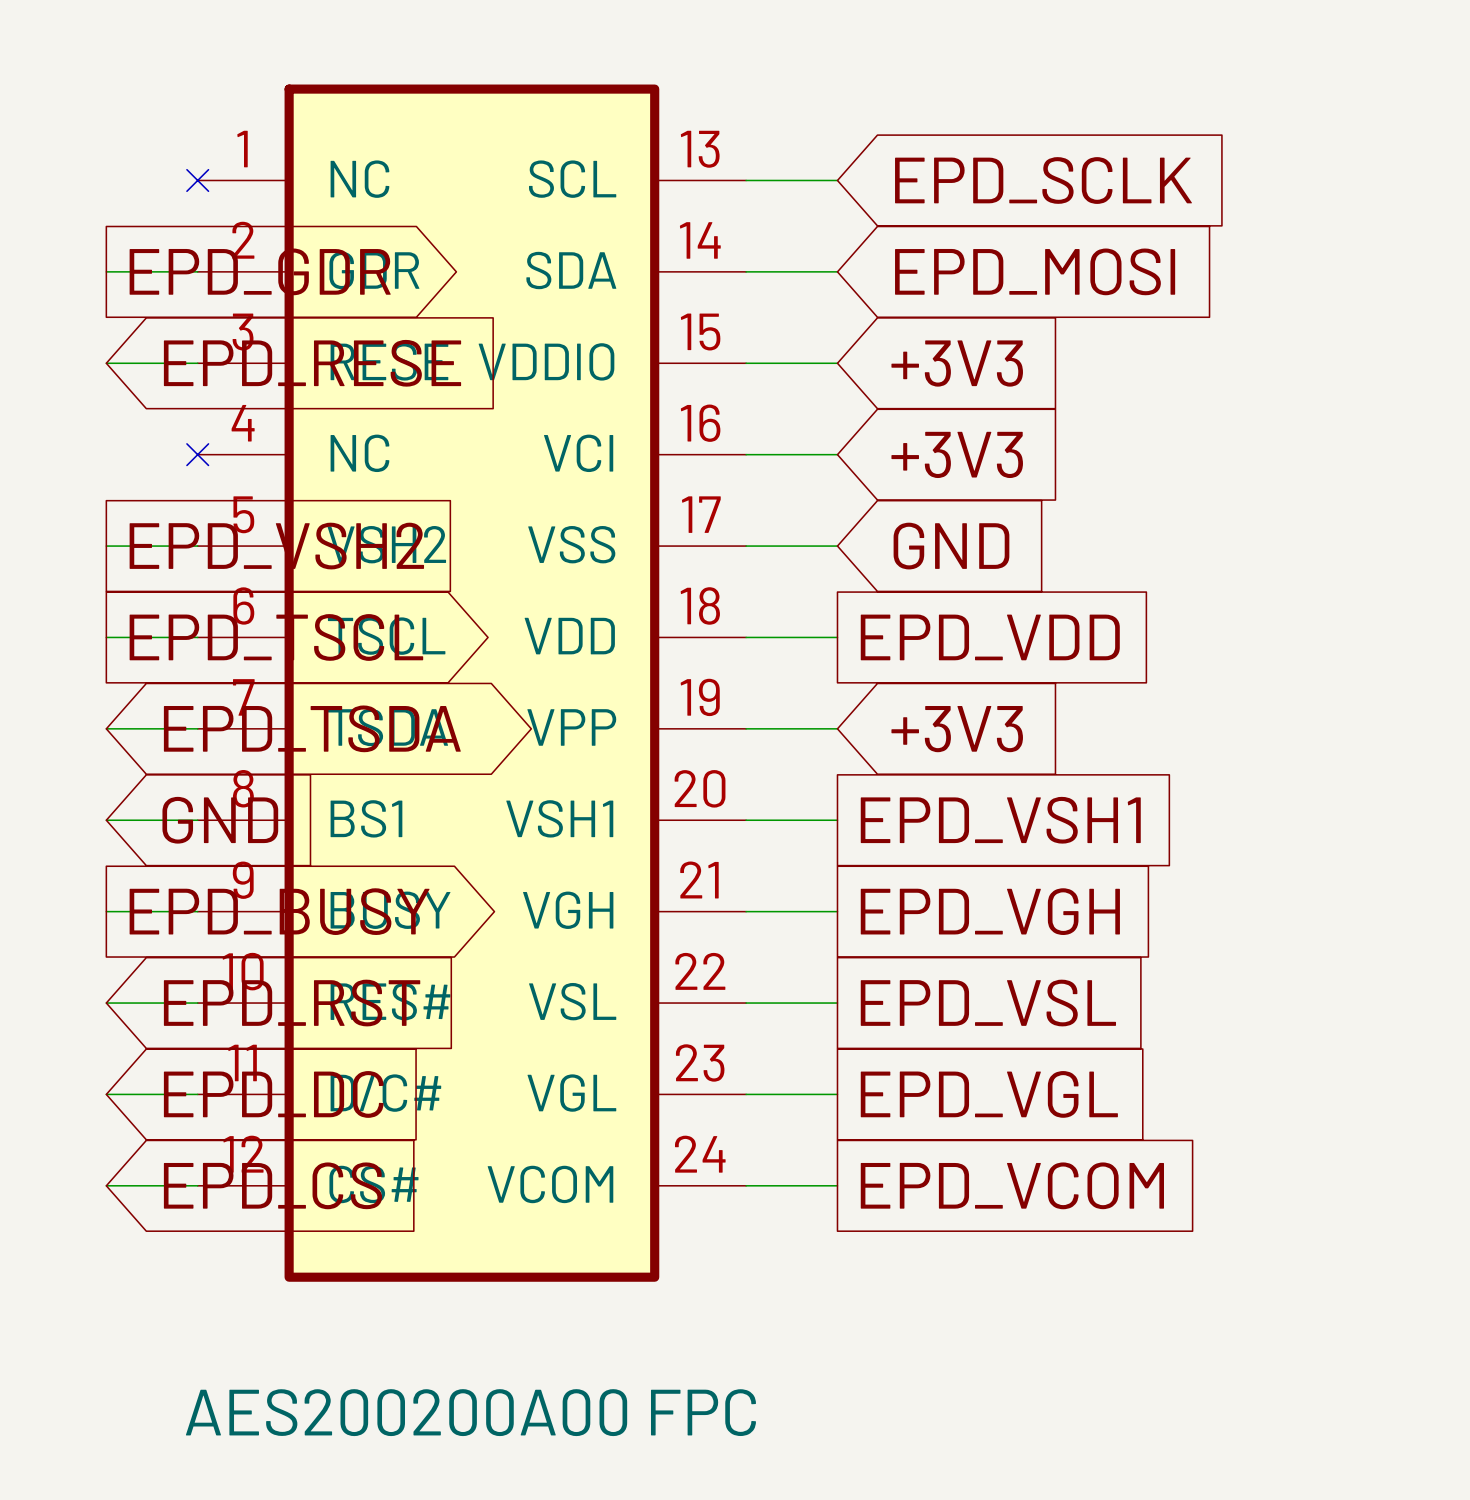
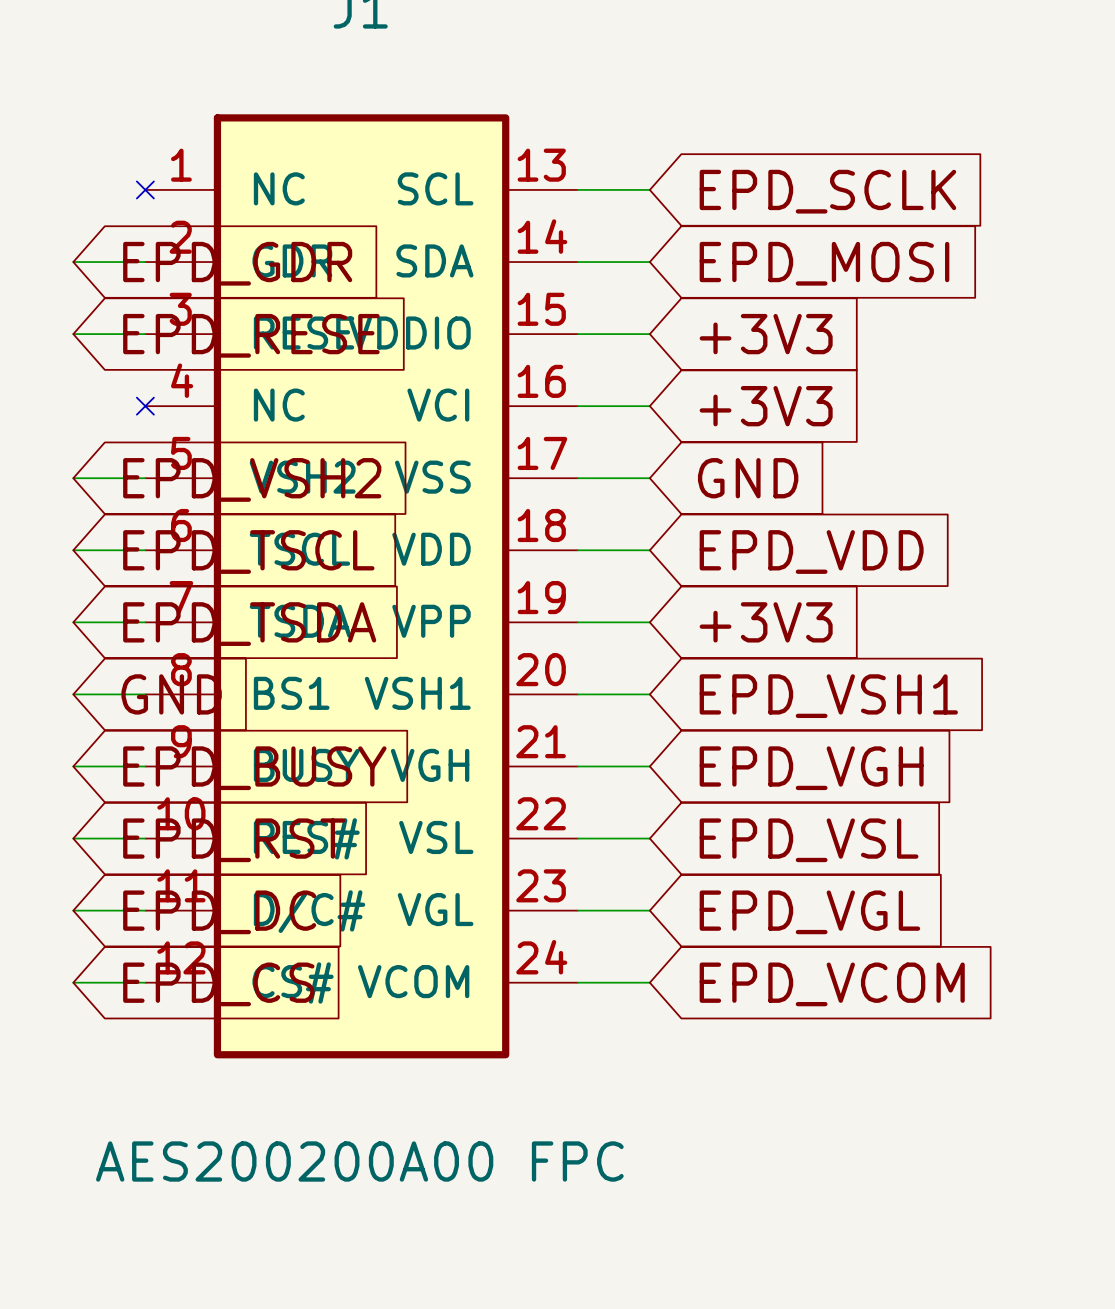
global label shape: output (260, 271) -> input (237, 263)
global label shape: passive (276, 546) -> input (252, 479)
global label shape: output (276, 637) -> input (248, 552)
global label shape: passive (990, 637) -> input (811, 552)
global label shape: bidirectional (312, 728) -> input (249, 624)
global label shape: passive (1000, 820) -> input (828, 696)
global label shape: output (279, 911) -> input (254, 768)
global label shape: passive (990, 911) -> input (811, 768)
global label shape: passive (988, 1003) -> input (809, 840)
global label shape: passive (989, 1094) -> input (809, 912)
global label shape: passive (1012, 1185) -> input (832, 984)

